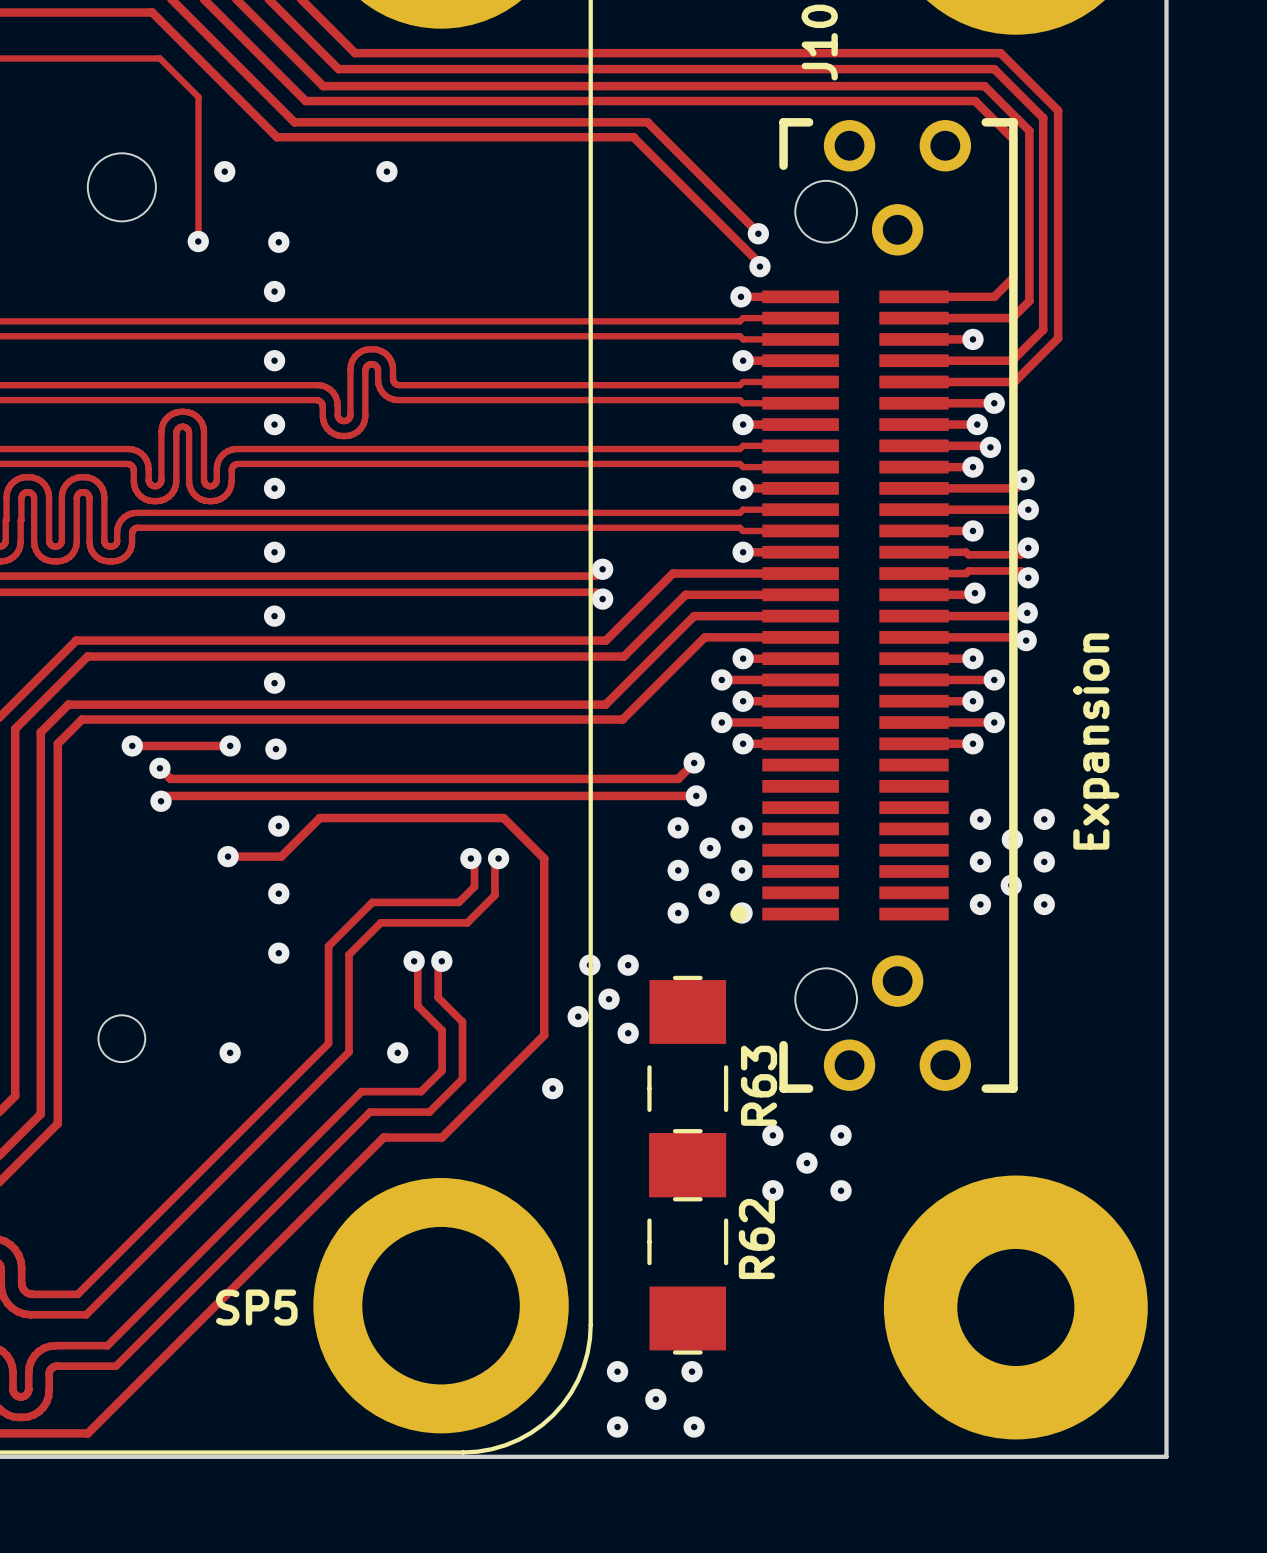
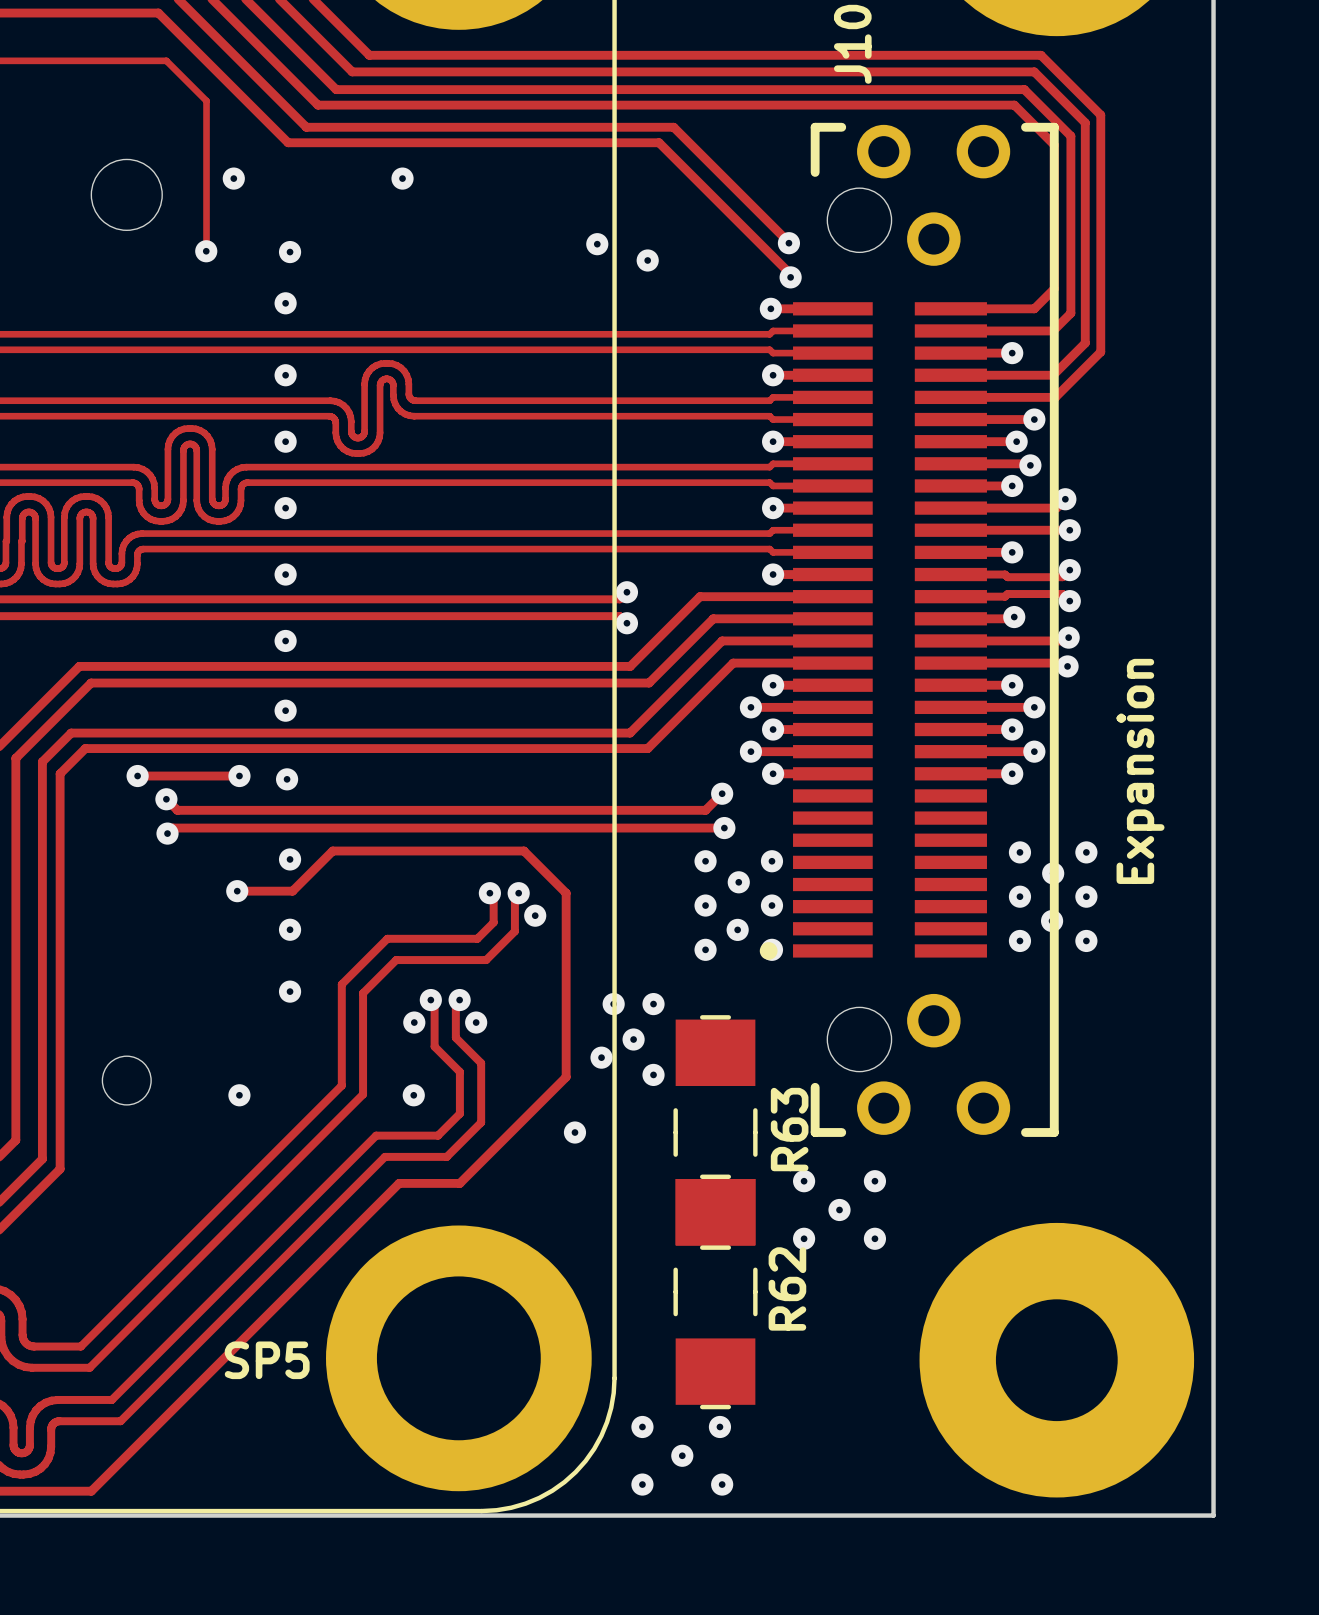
via: none -> (597, 244)
via: none -> (647, 260)
via: none -> (535, 915)
via: none -> (414, 1022)
via: none -> (476, 1022)

